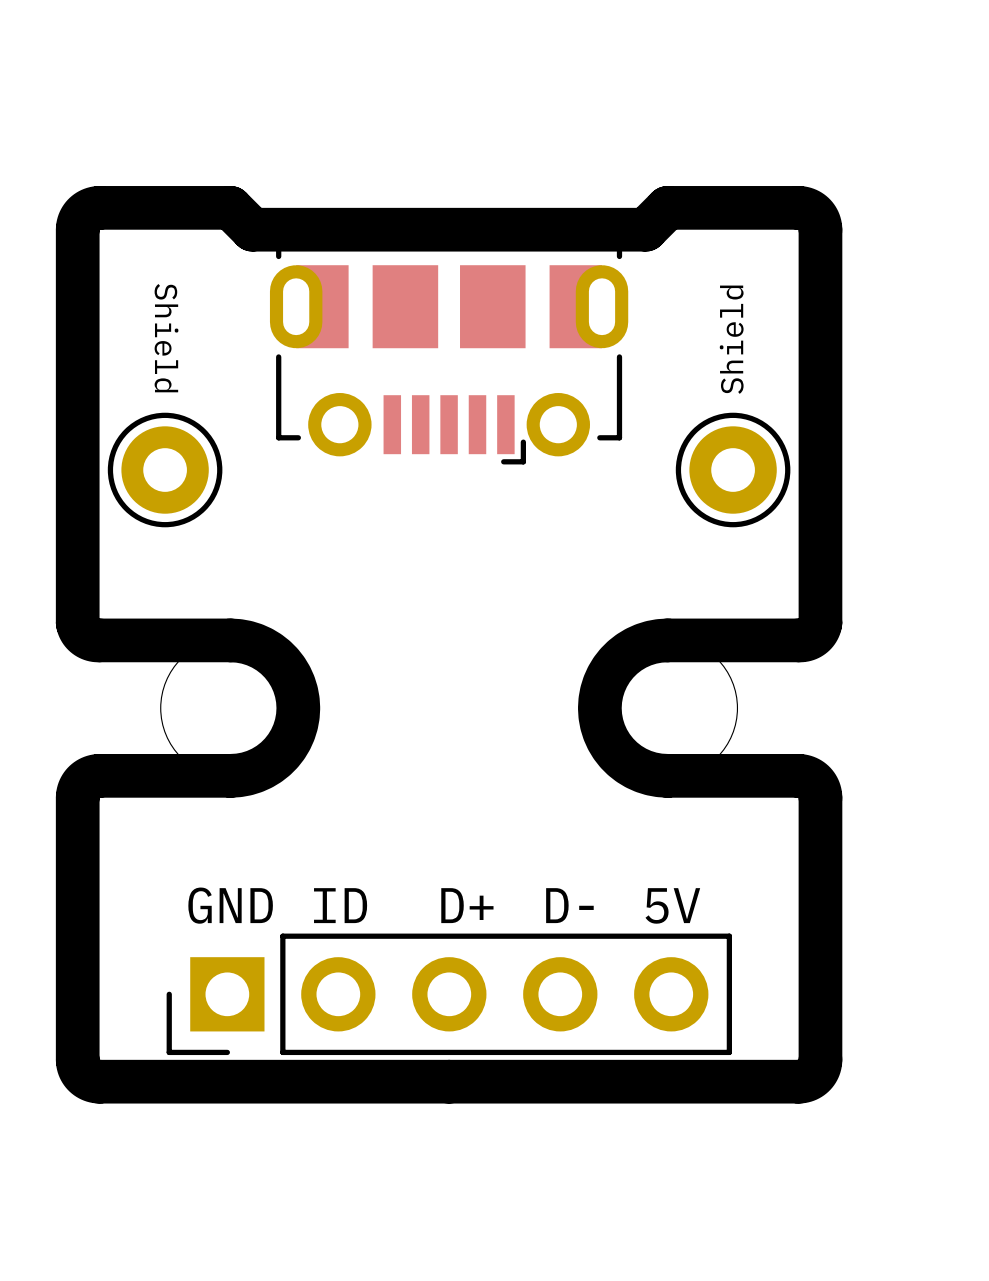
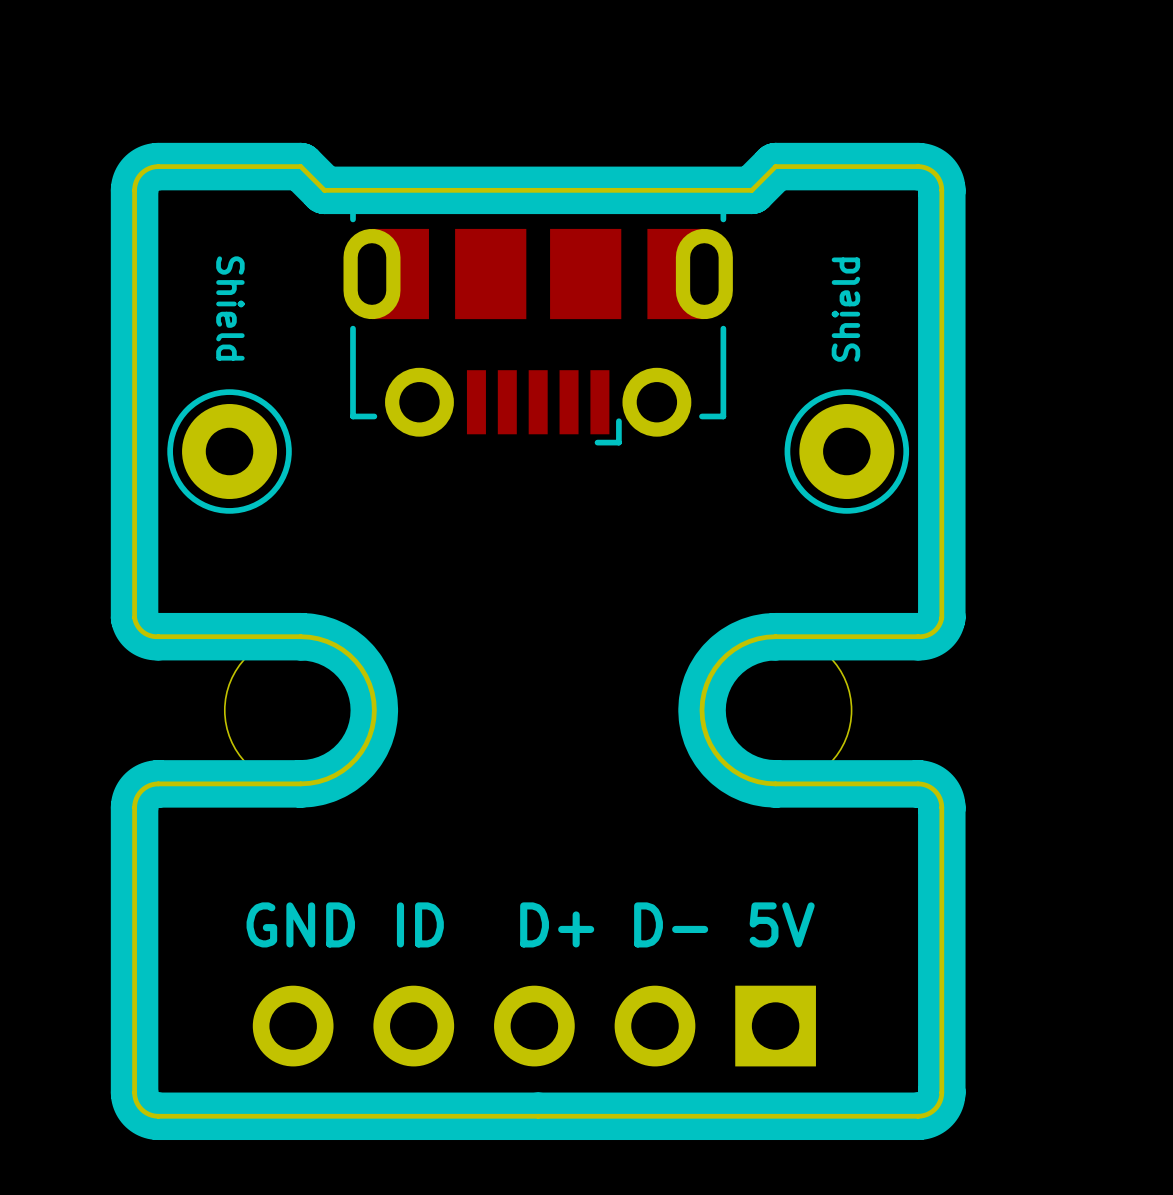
part side: top (449, 994) -> bottom (534, 1026)

